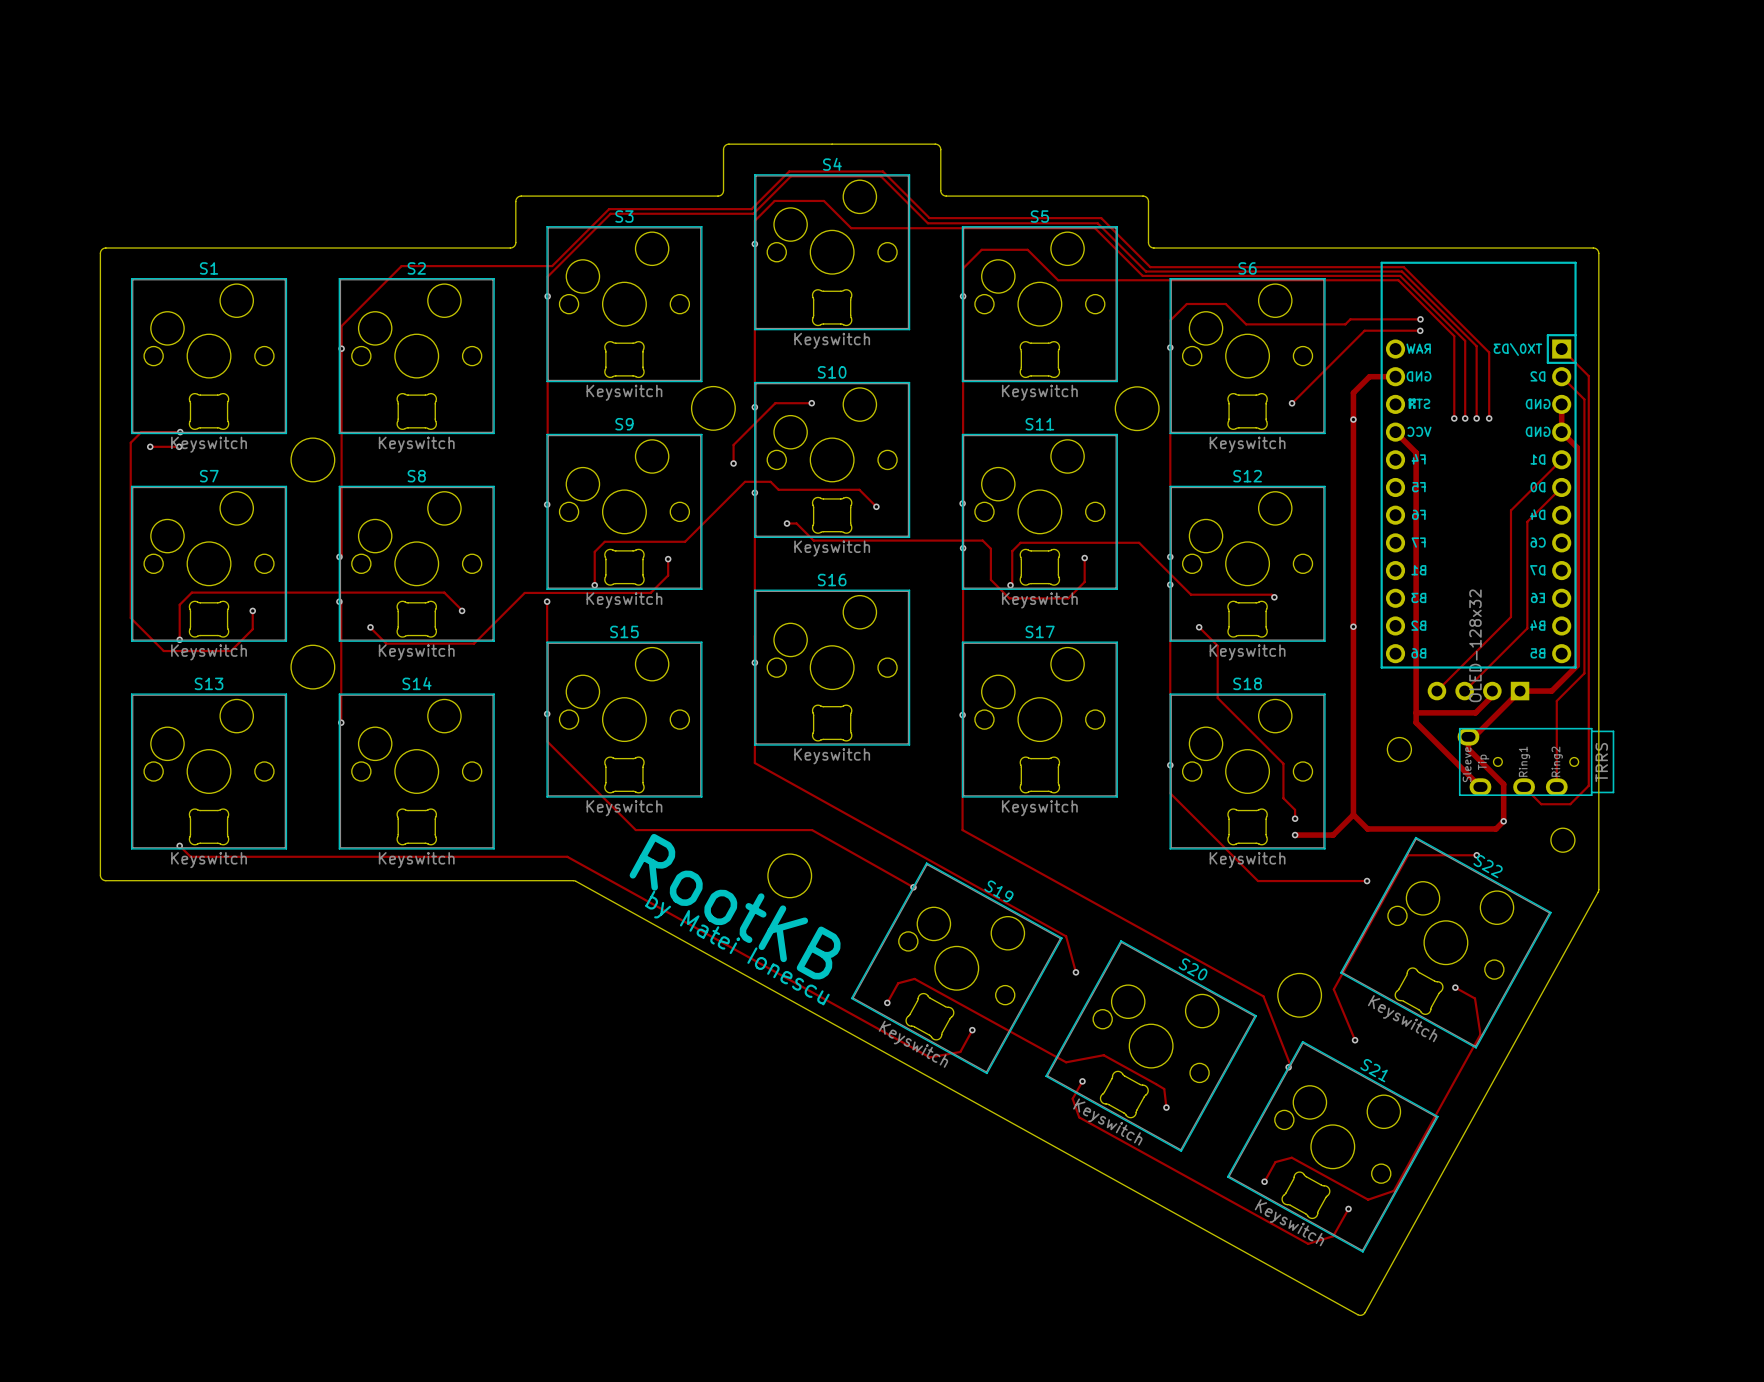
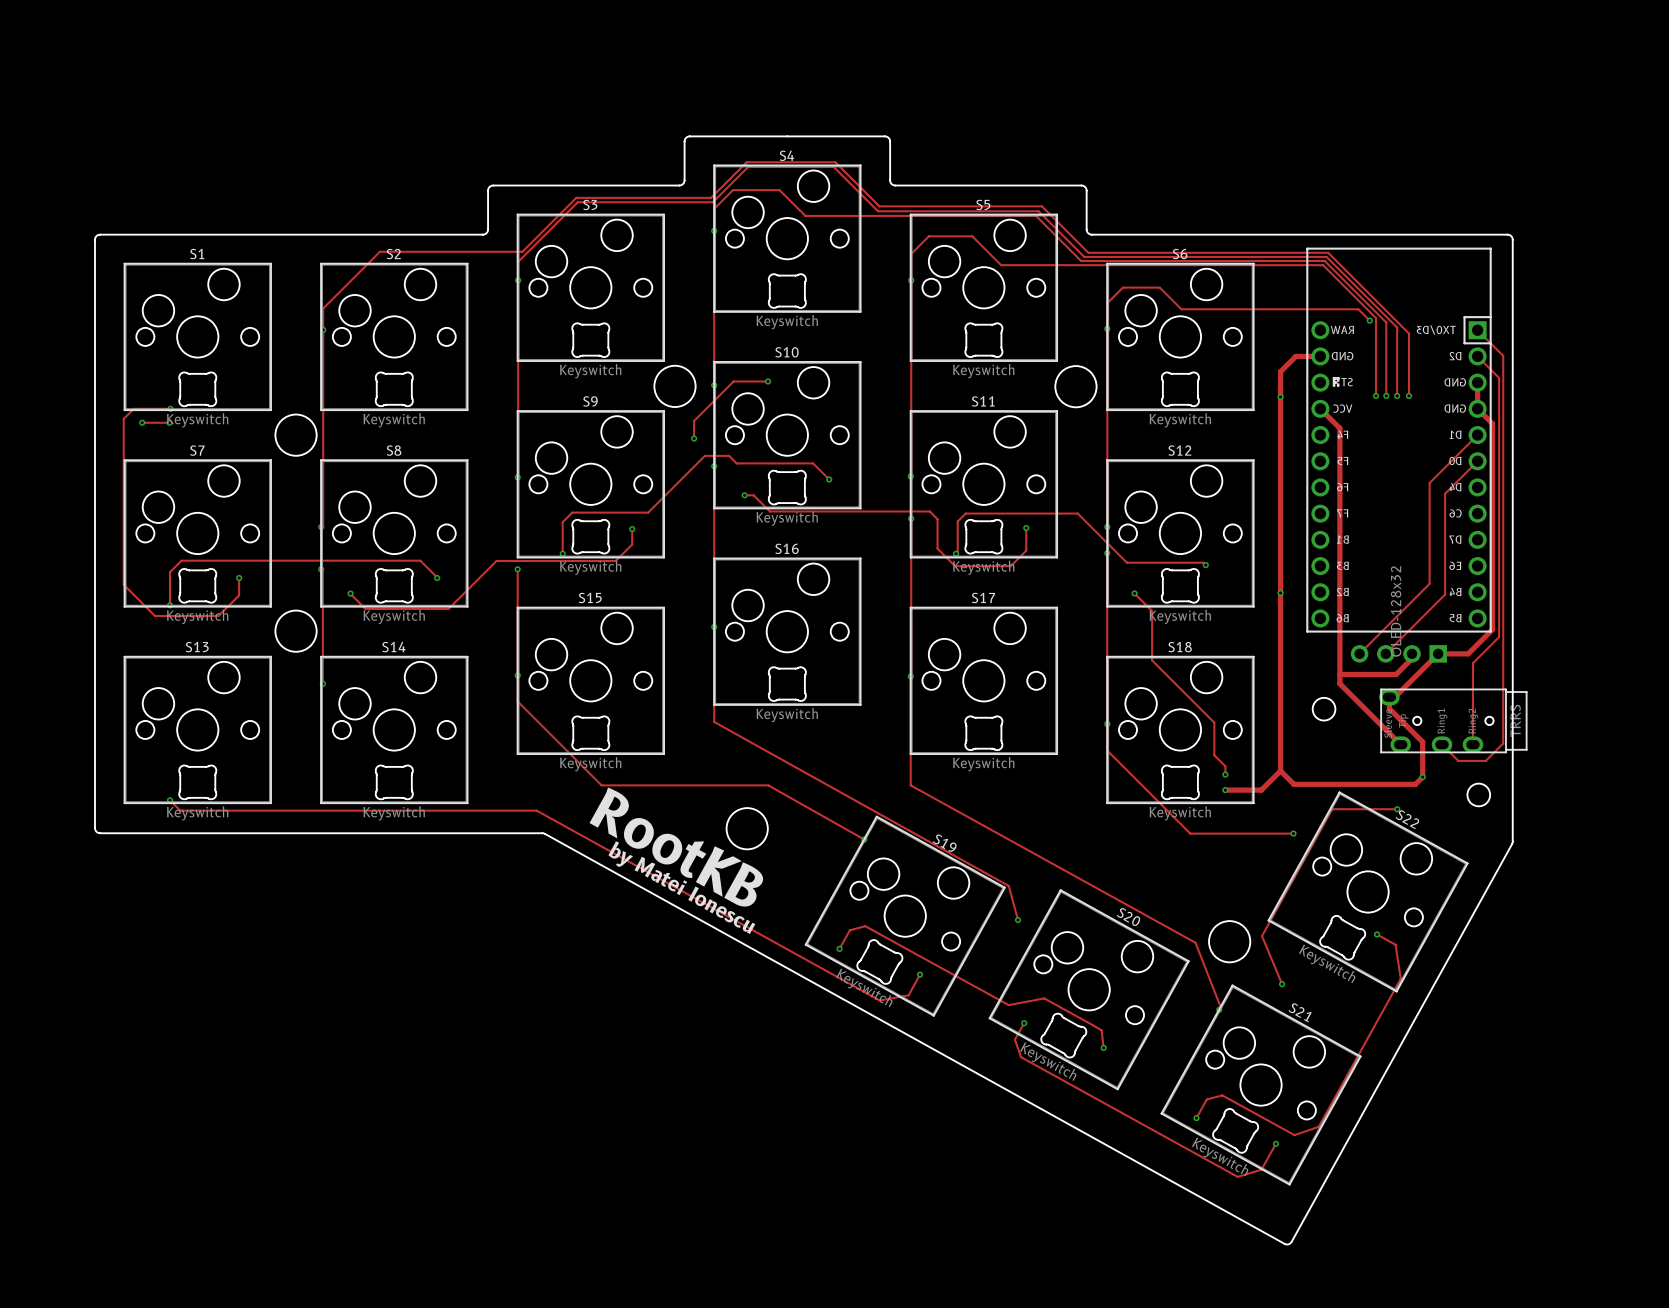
track: (1420, 319) (1350, 319) (1345, 324) (1246, 324) -> (1369, 320) (1358, 309) (1181, 309) (1179, 306)
via: (1420, 319) -> none
track: (1420, 330) (1364, 330) (1292, 403) -> none
via: (1420, 330) -> none
via: none -> (1369, 320)
via: (1292, 403) -> none

